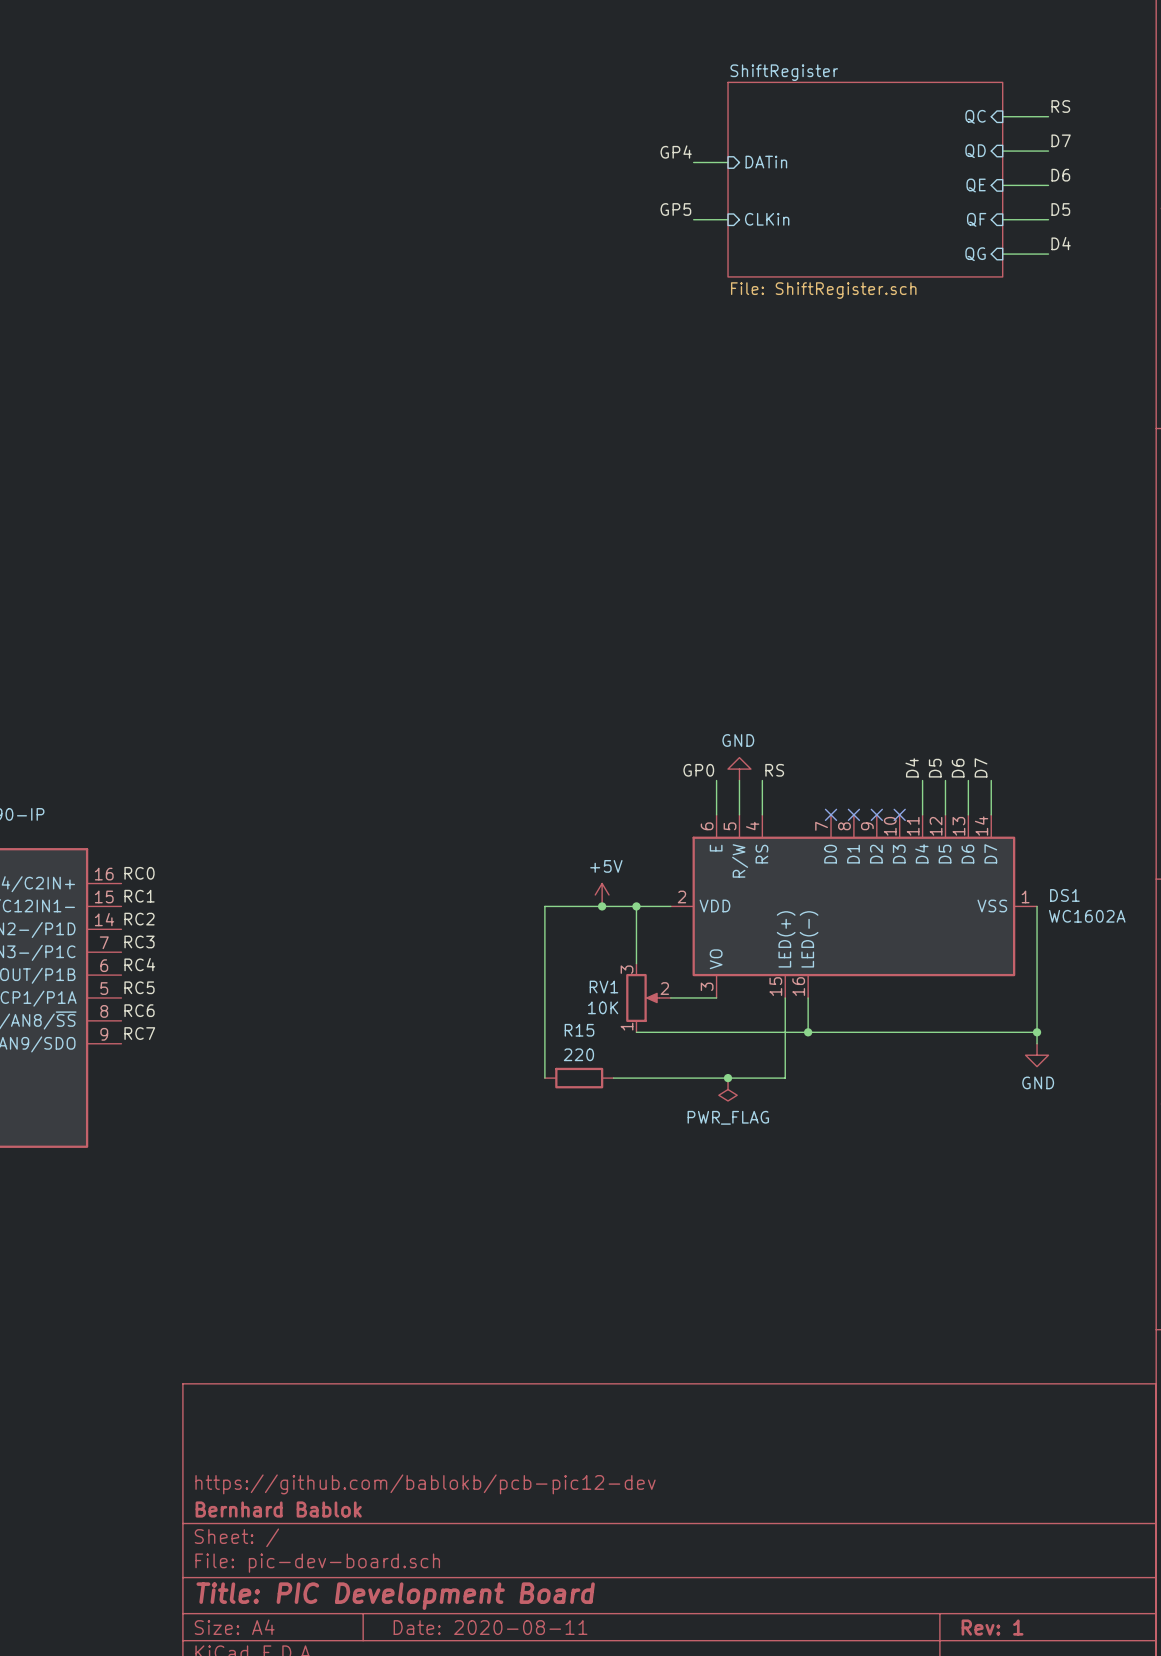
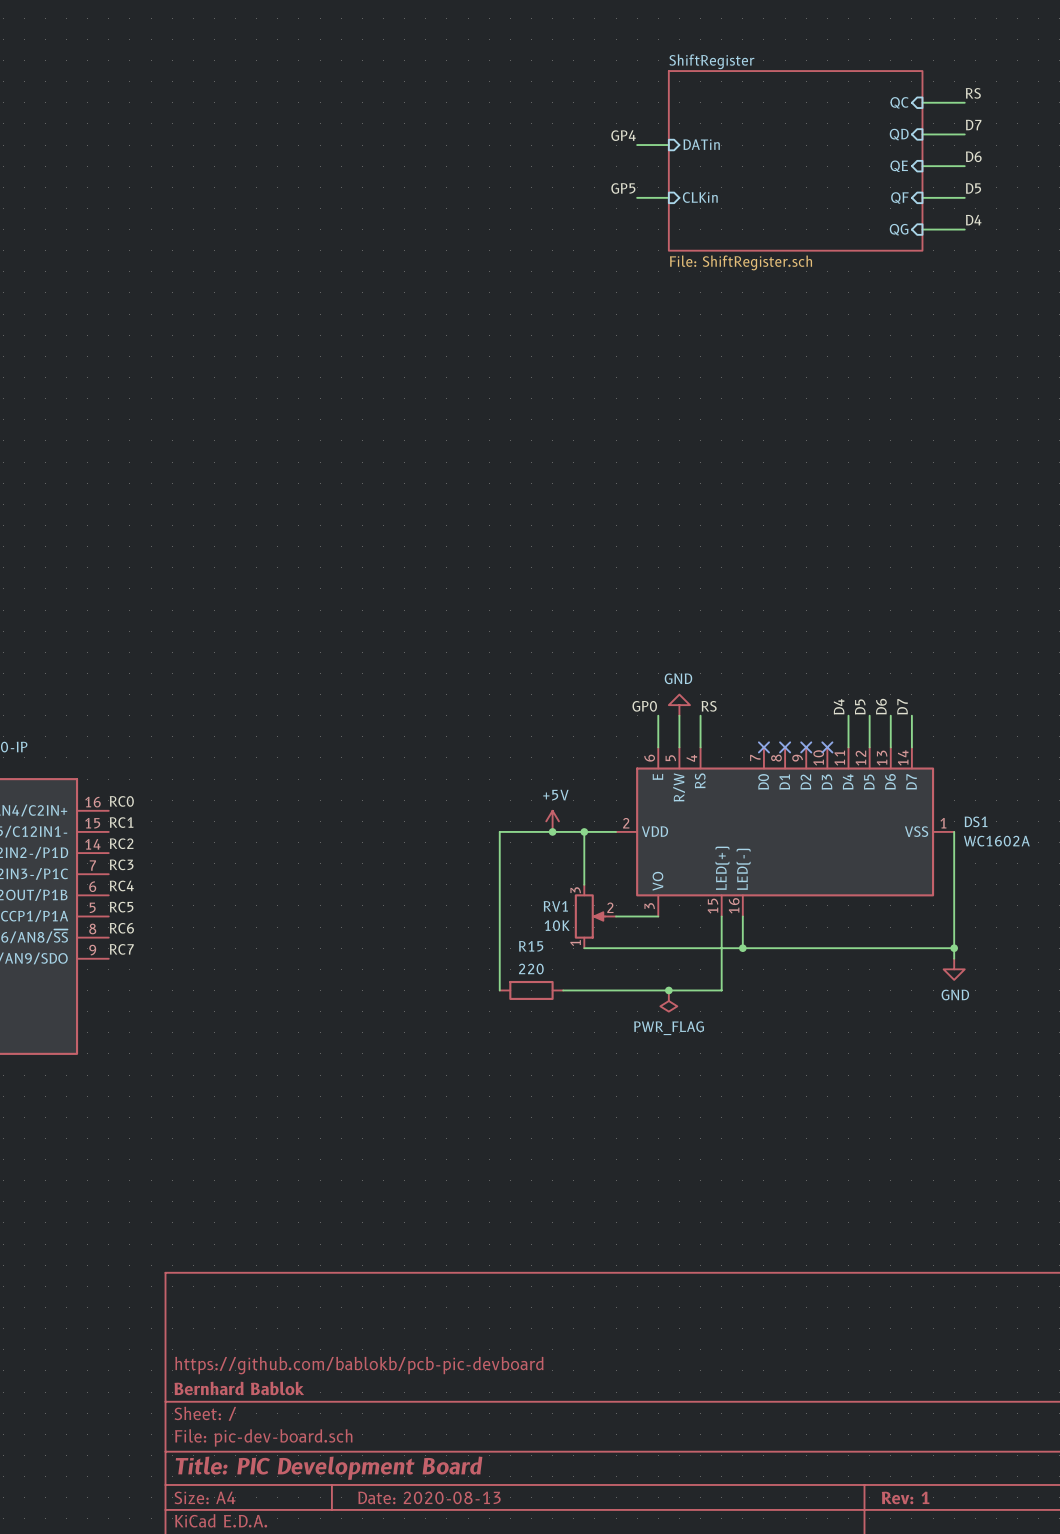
title block: https://github.com/bablokb/pcb-pic12-dev (425, 1484) -> https://github.com/bablokb/pcb-pic-devboard (359, 1365)
title block: Date: 2020-08-11 (490, 1627) -> Date: 2020-08-13 (429, 1497)

